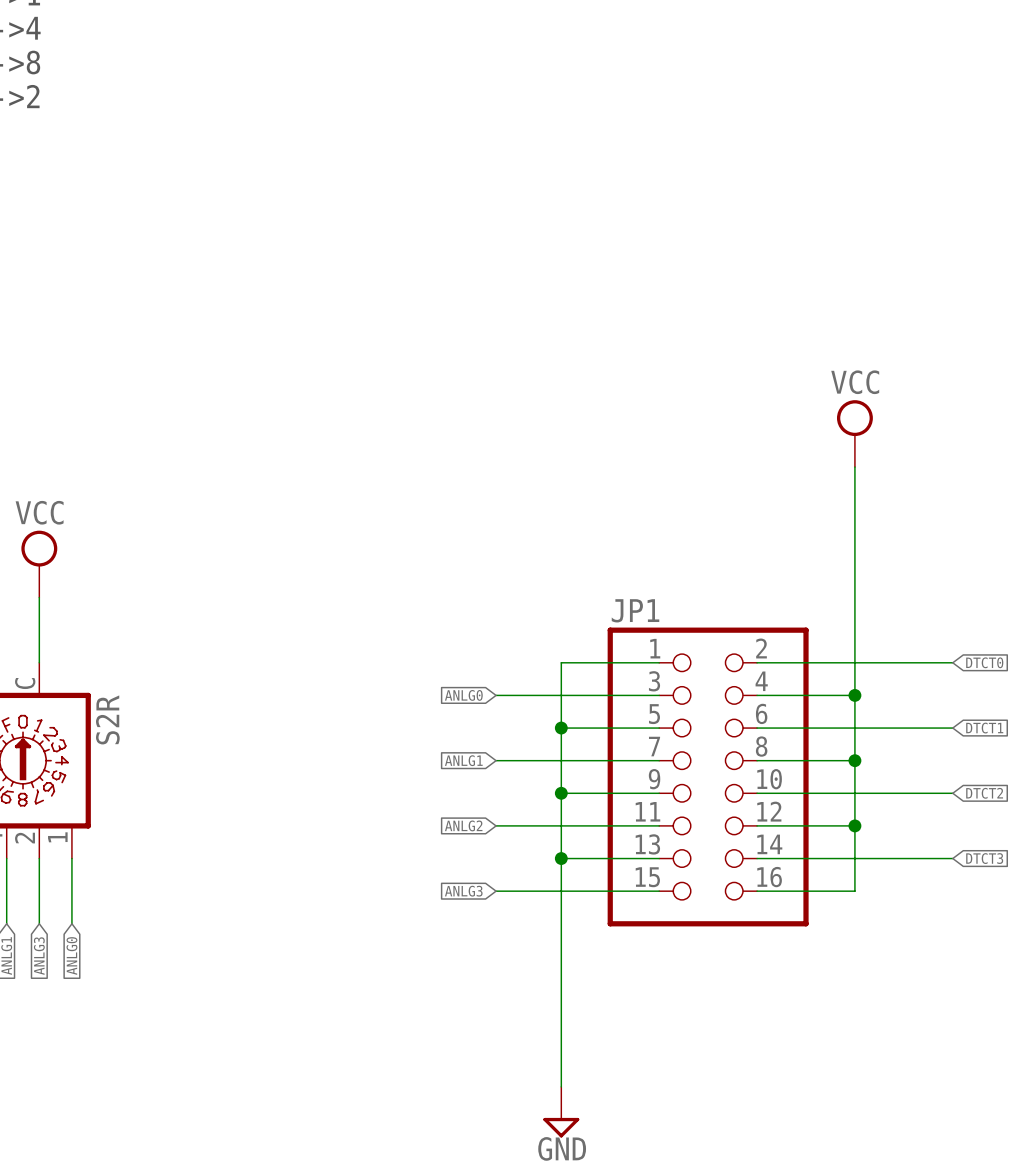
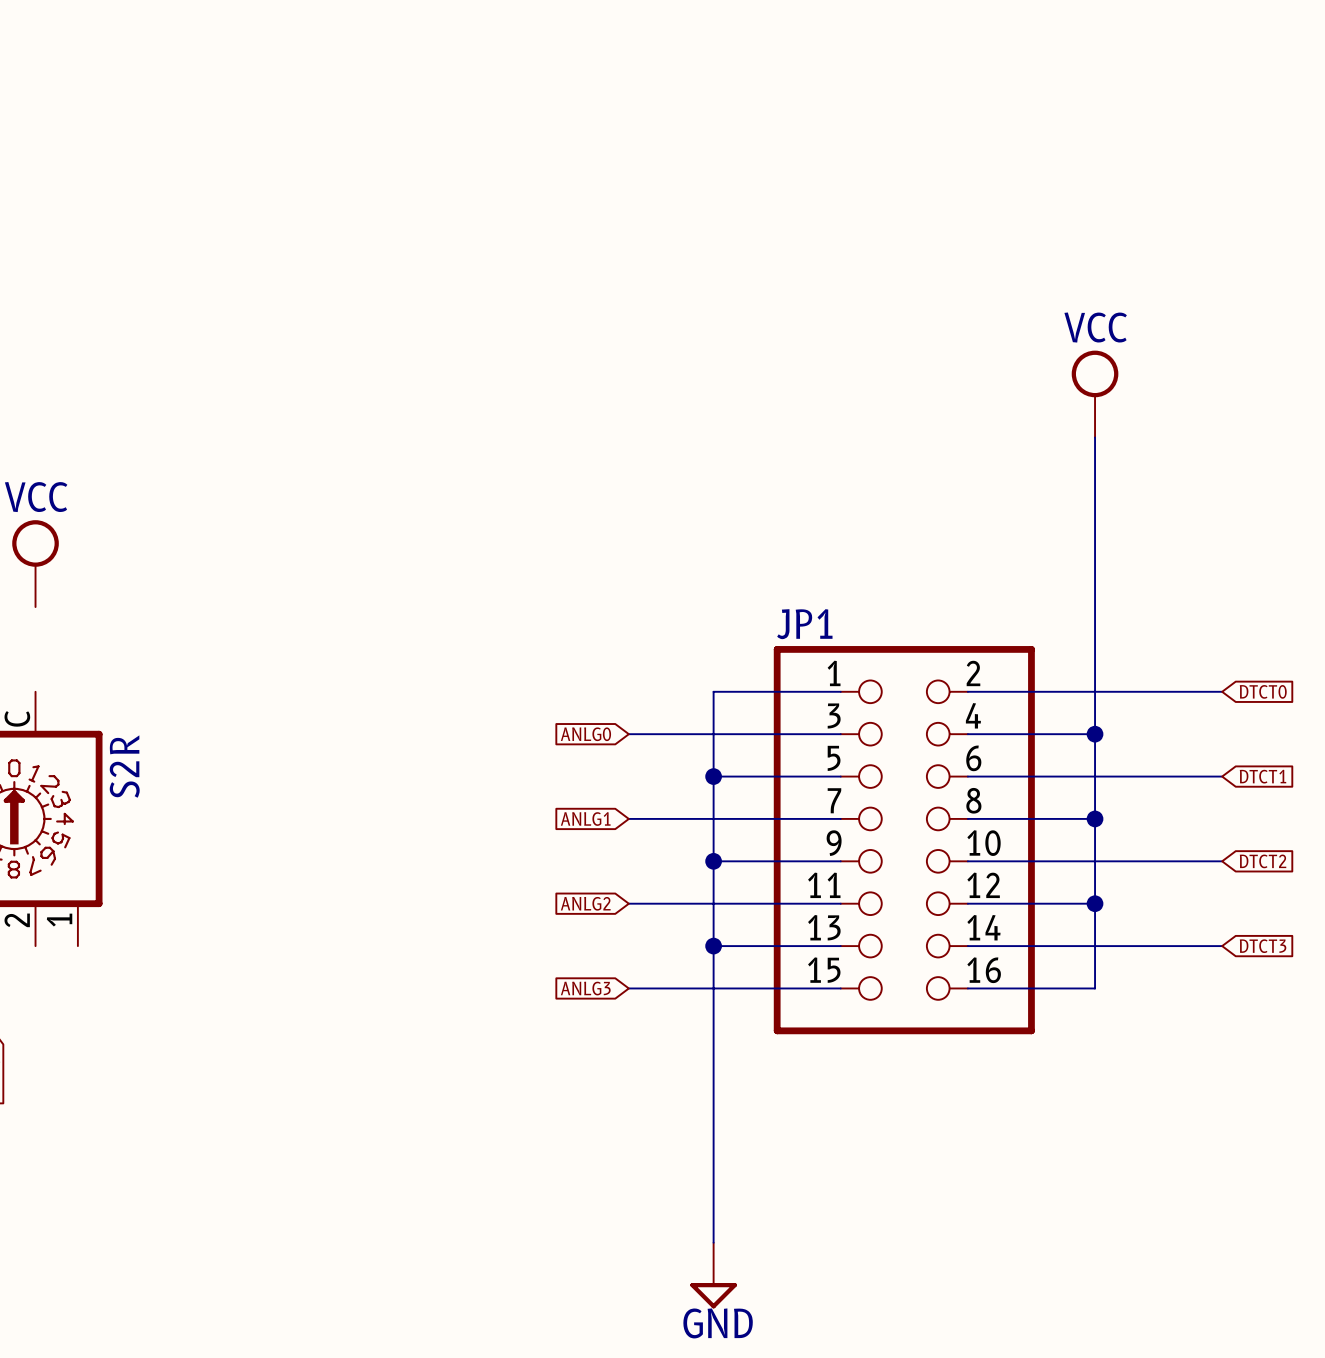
wire: (39, 597) (39, 662) -> none
wire: (39, 858) (39, 923) -> none
wire: (71, 858) (71, 923) -> none
global label: ANLG3 (39, 956) -> none
global label: ANLG0 (71, 956) -> none

